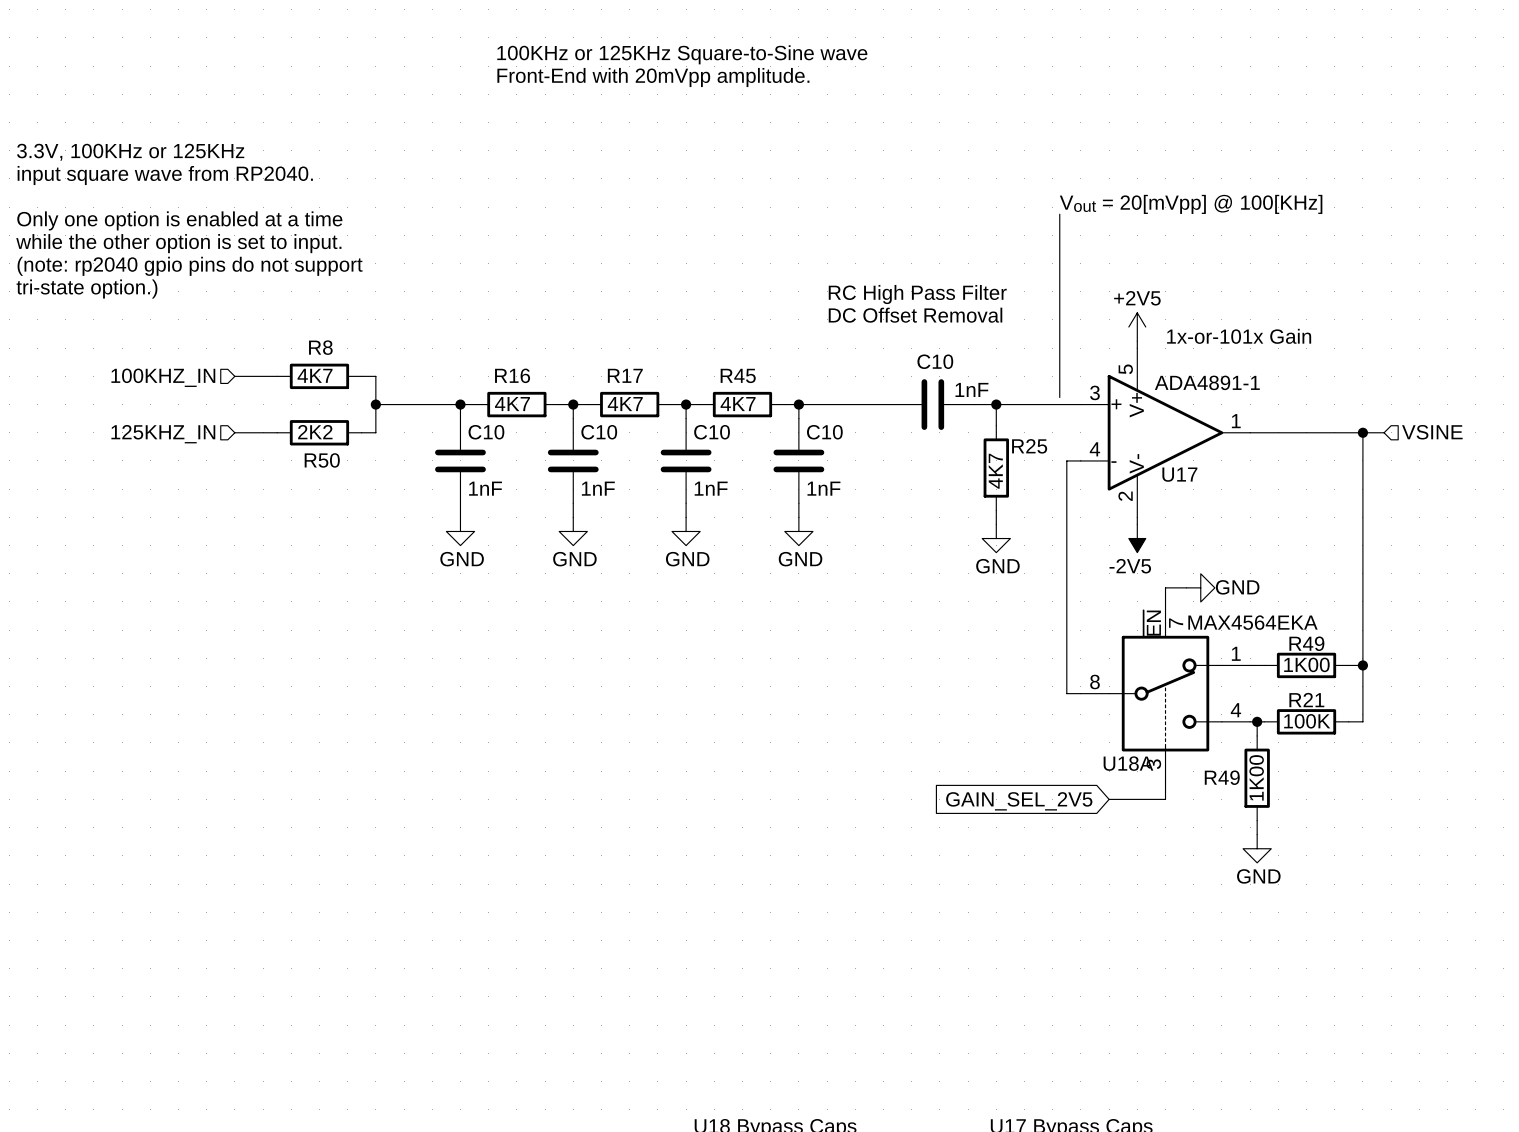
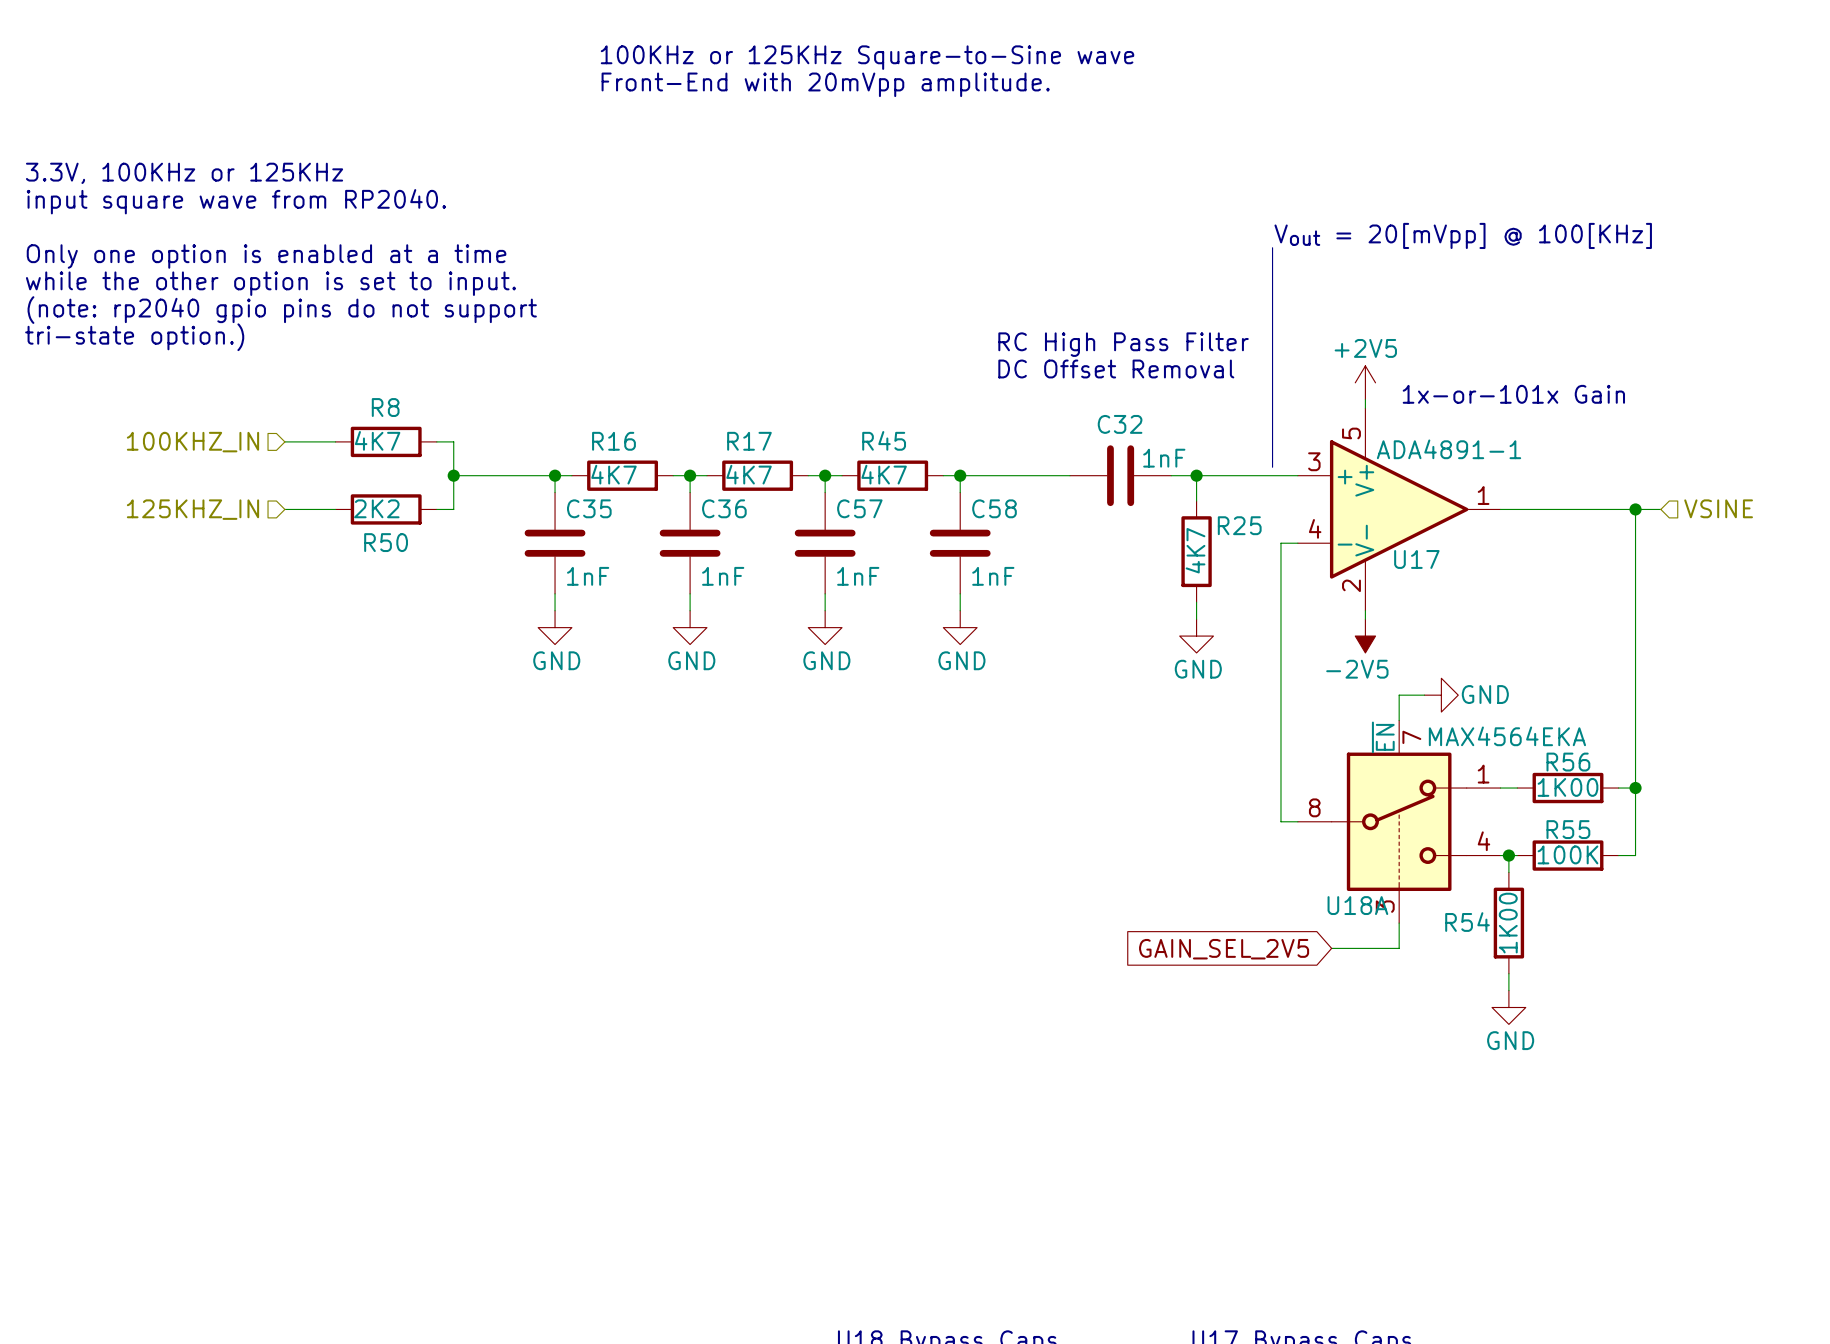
C10 name: C10 (935, 361) -> C32 (1120, 424)
C10 name: C10 (486, 432) -> C35 (589, 508)
C10 name: C10 (599, 432) -> C36 (724, 508)
C10 name: C10 (712, 432) -> C57 (859, 508)
C10 name: C10 (824, 432) -> C58 (994, 508)
R49 name: R49 (1306, 643) -> R56 (1568, 762)
R21 name: R21 (1306, 700) -> R55 (1568, 829)
R49 name: R49 (1222, 777) -> R54 (1467, 922)

